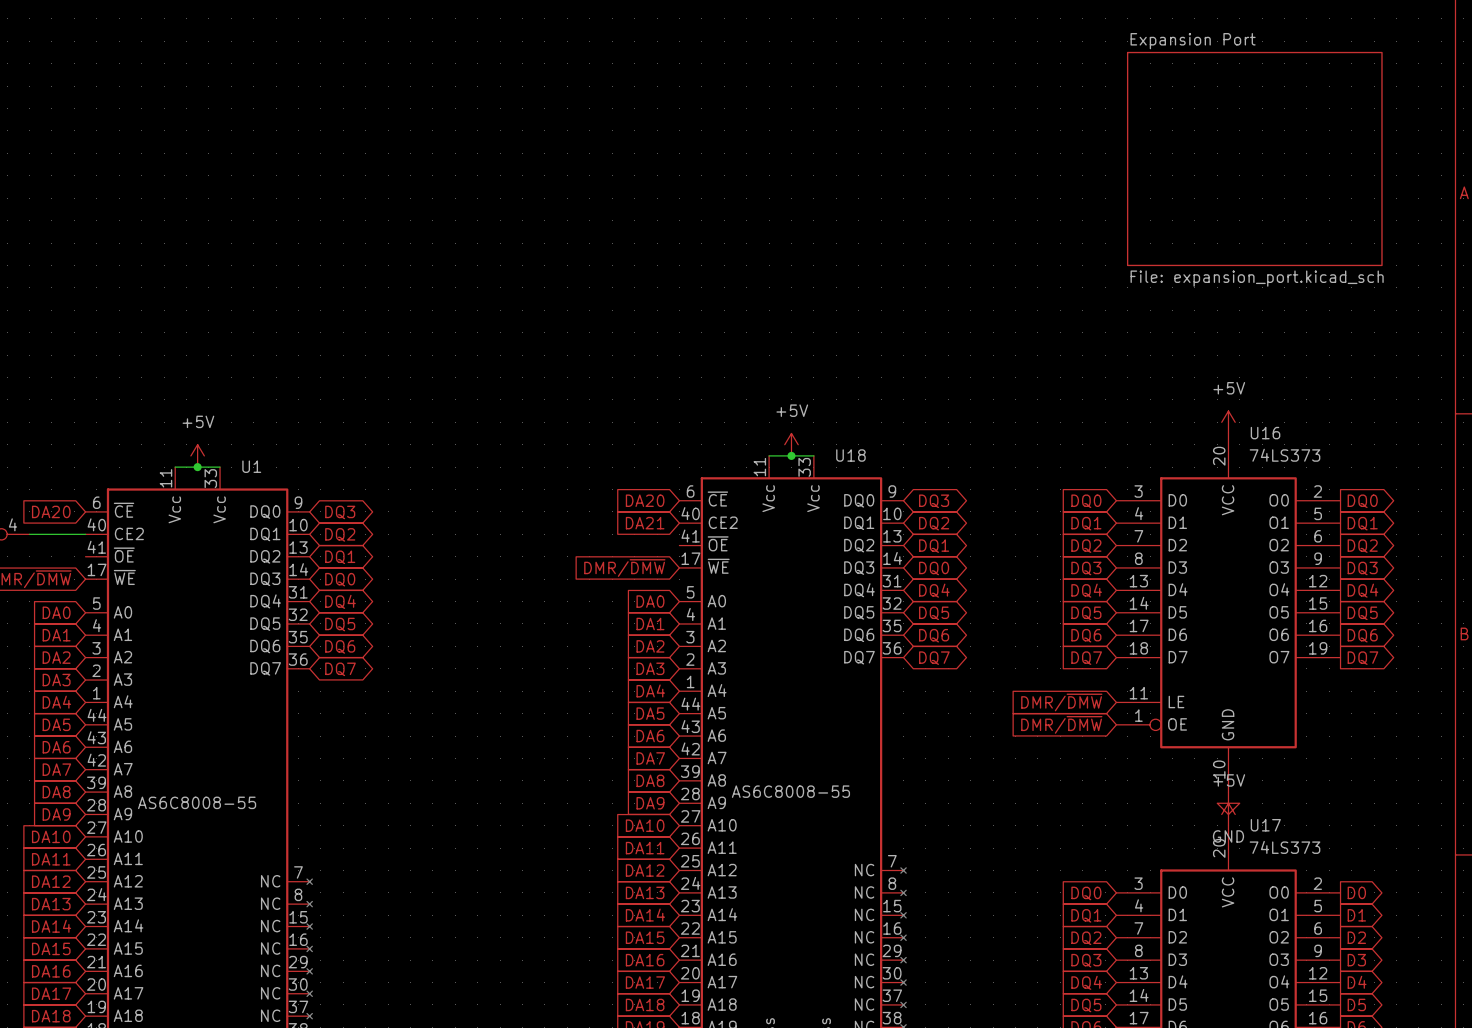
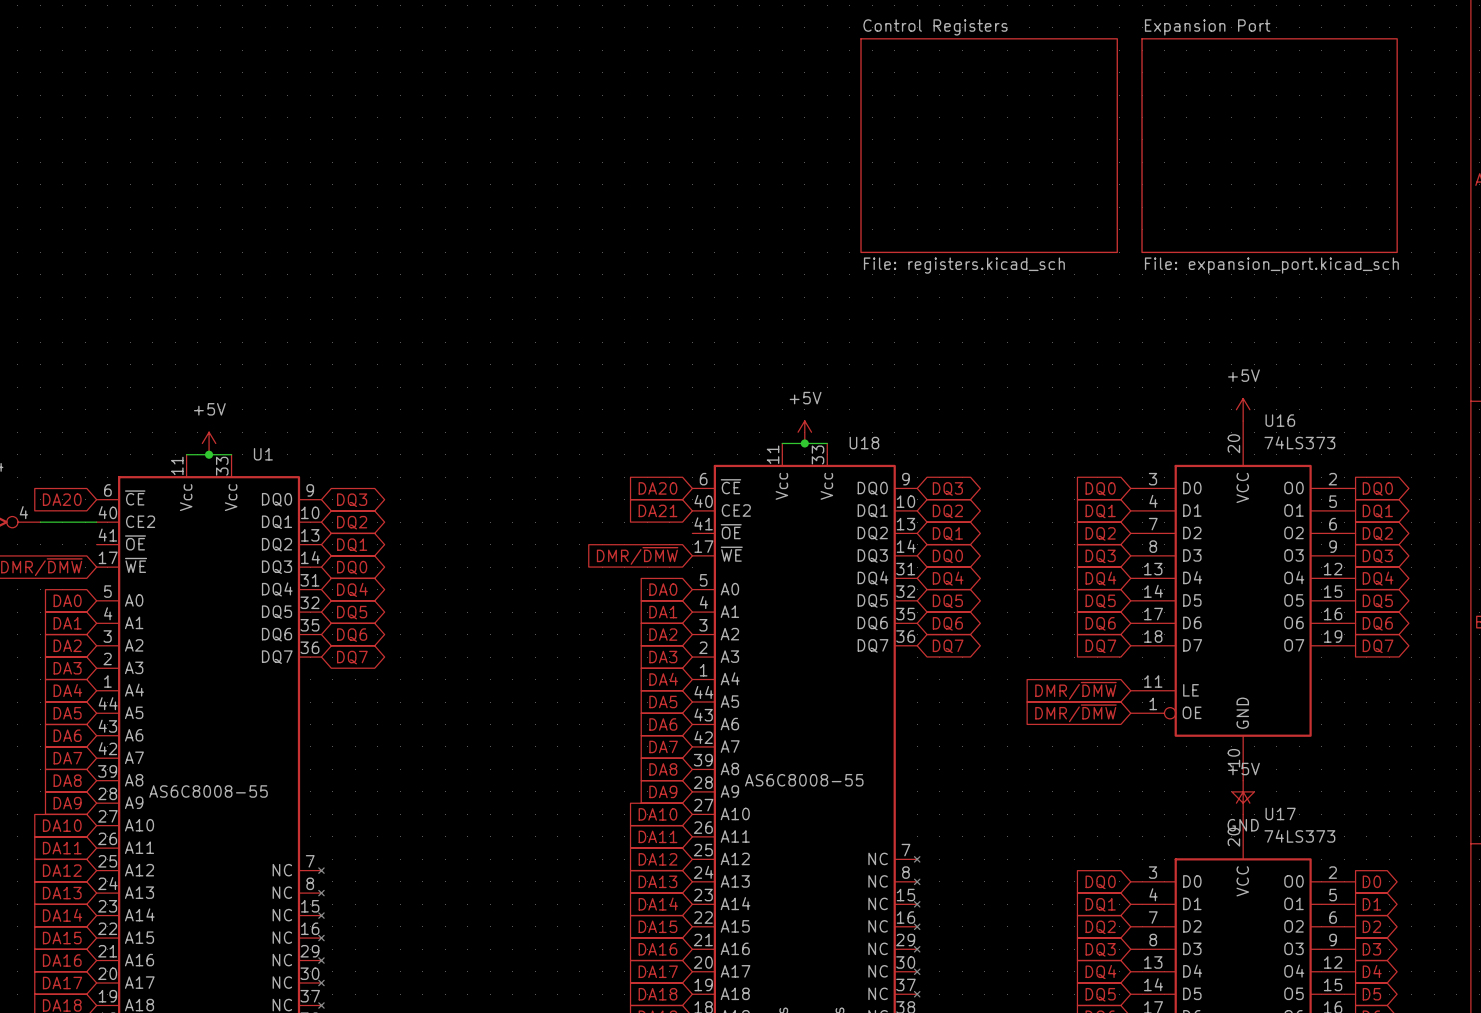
sheet Control Registers: none -> File: registers.kicad_sch (989, 145)

